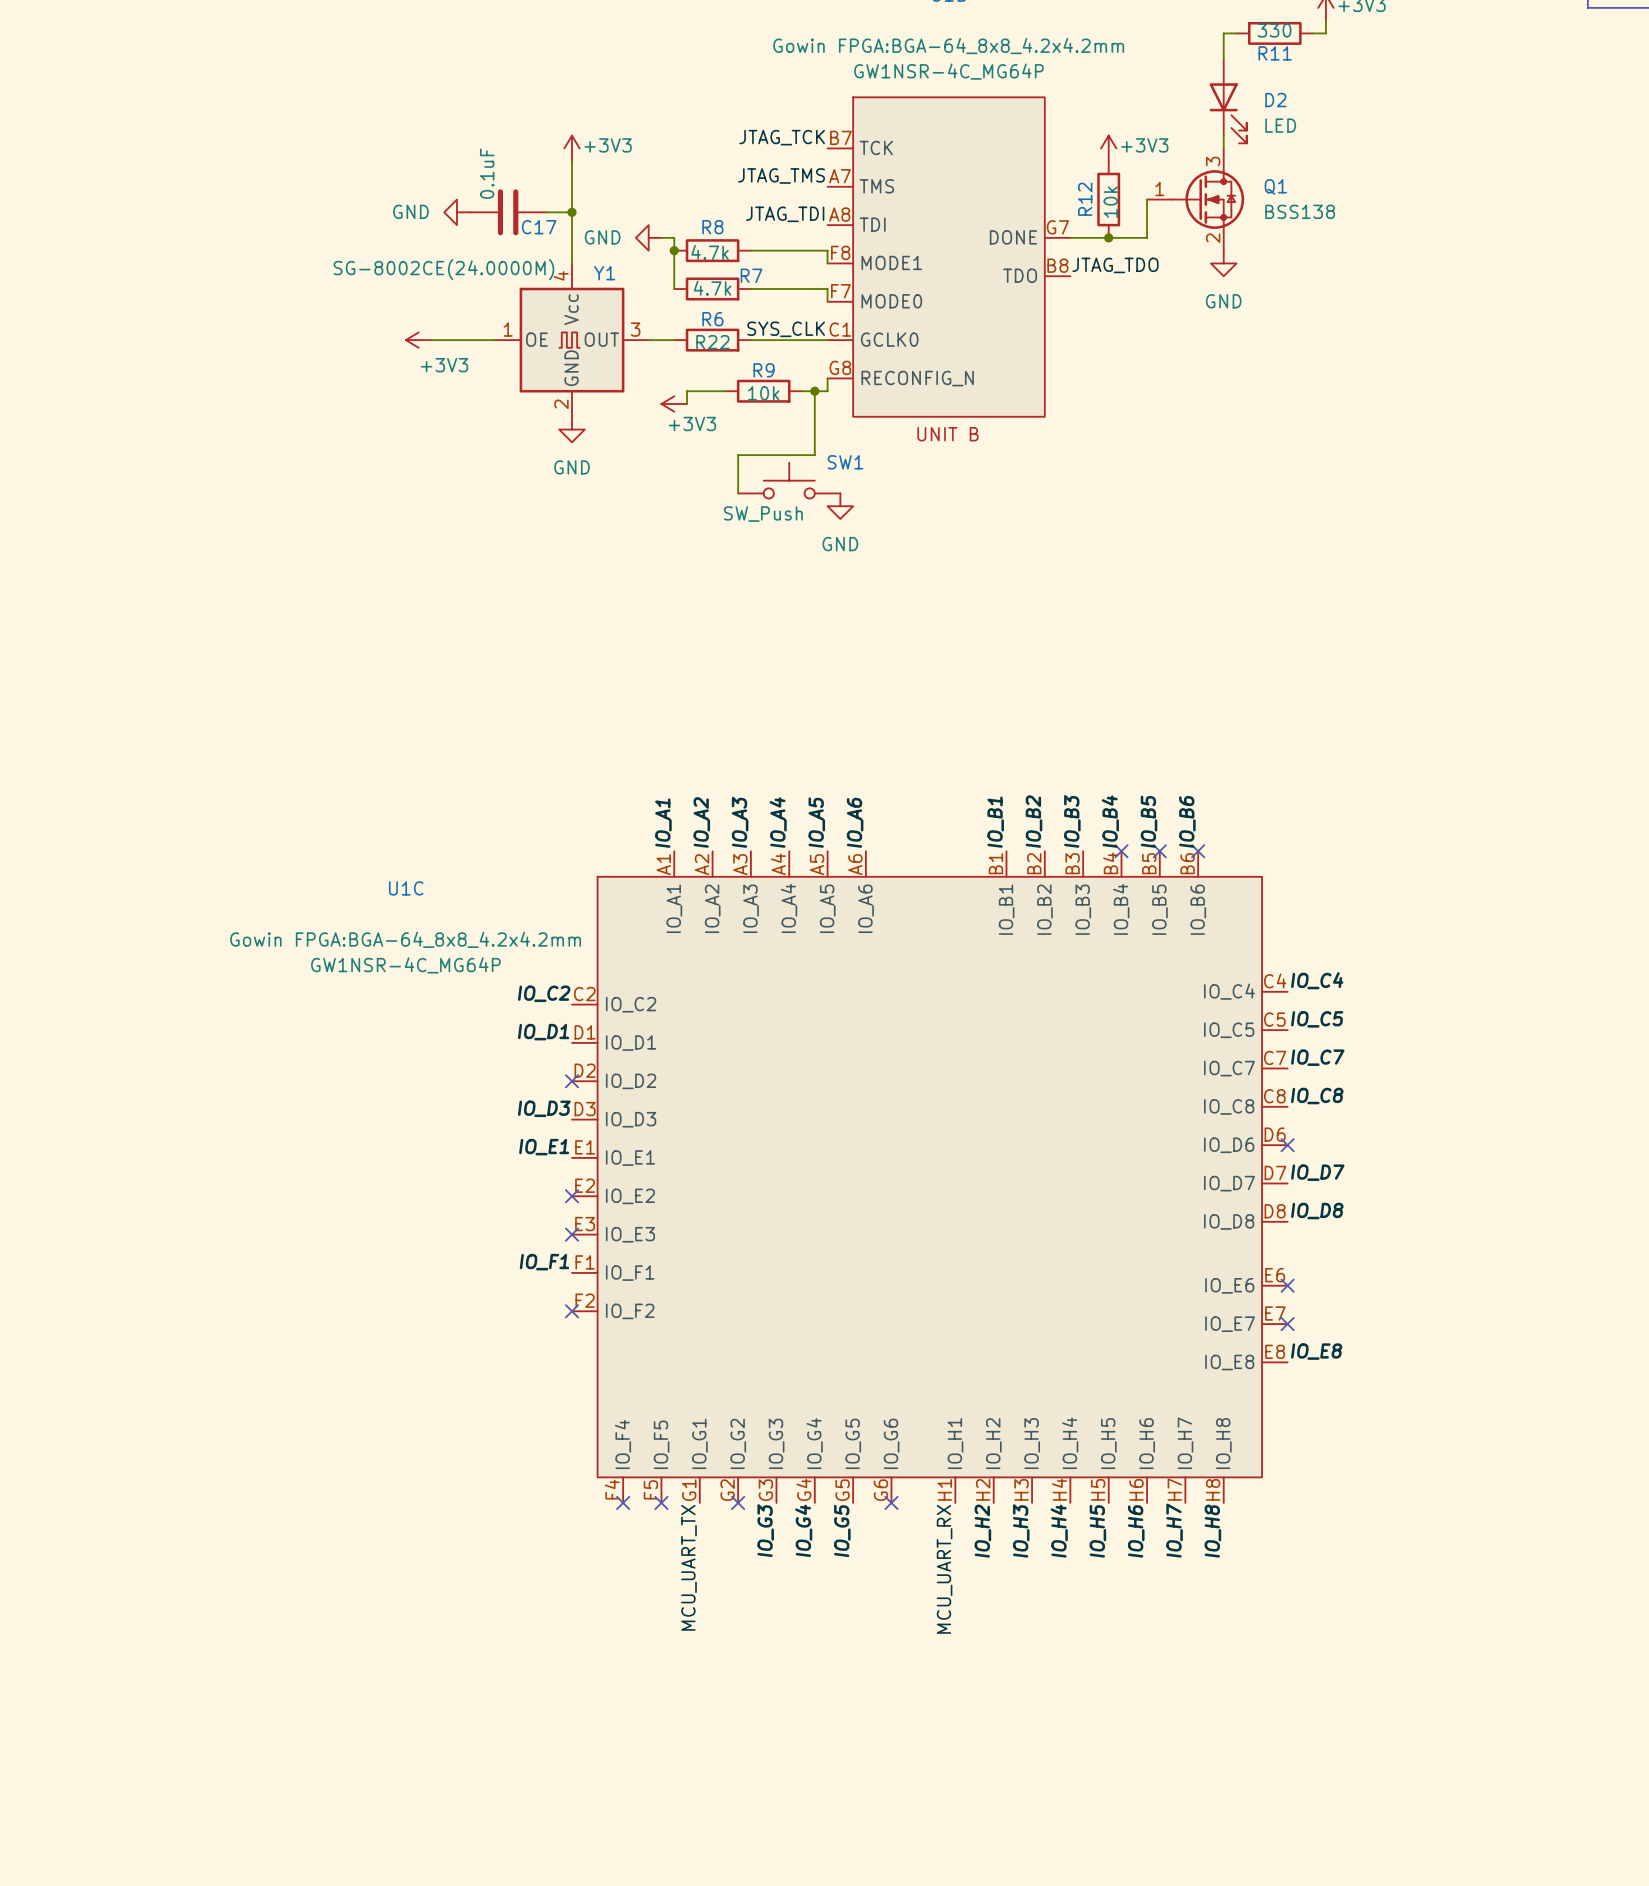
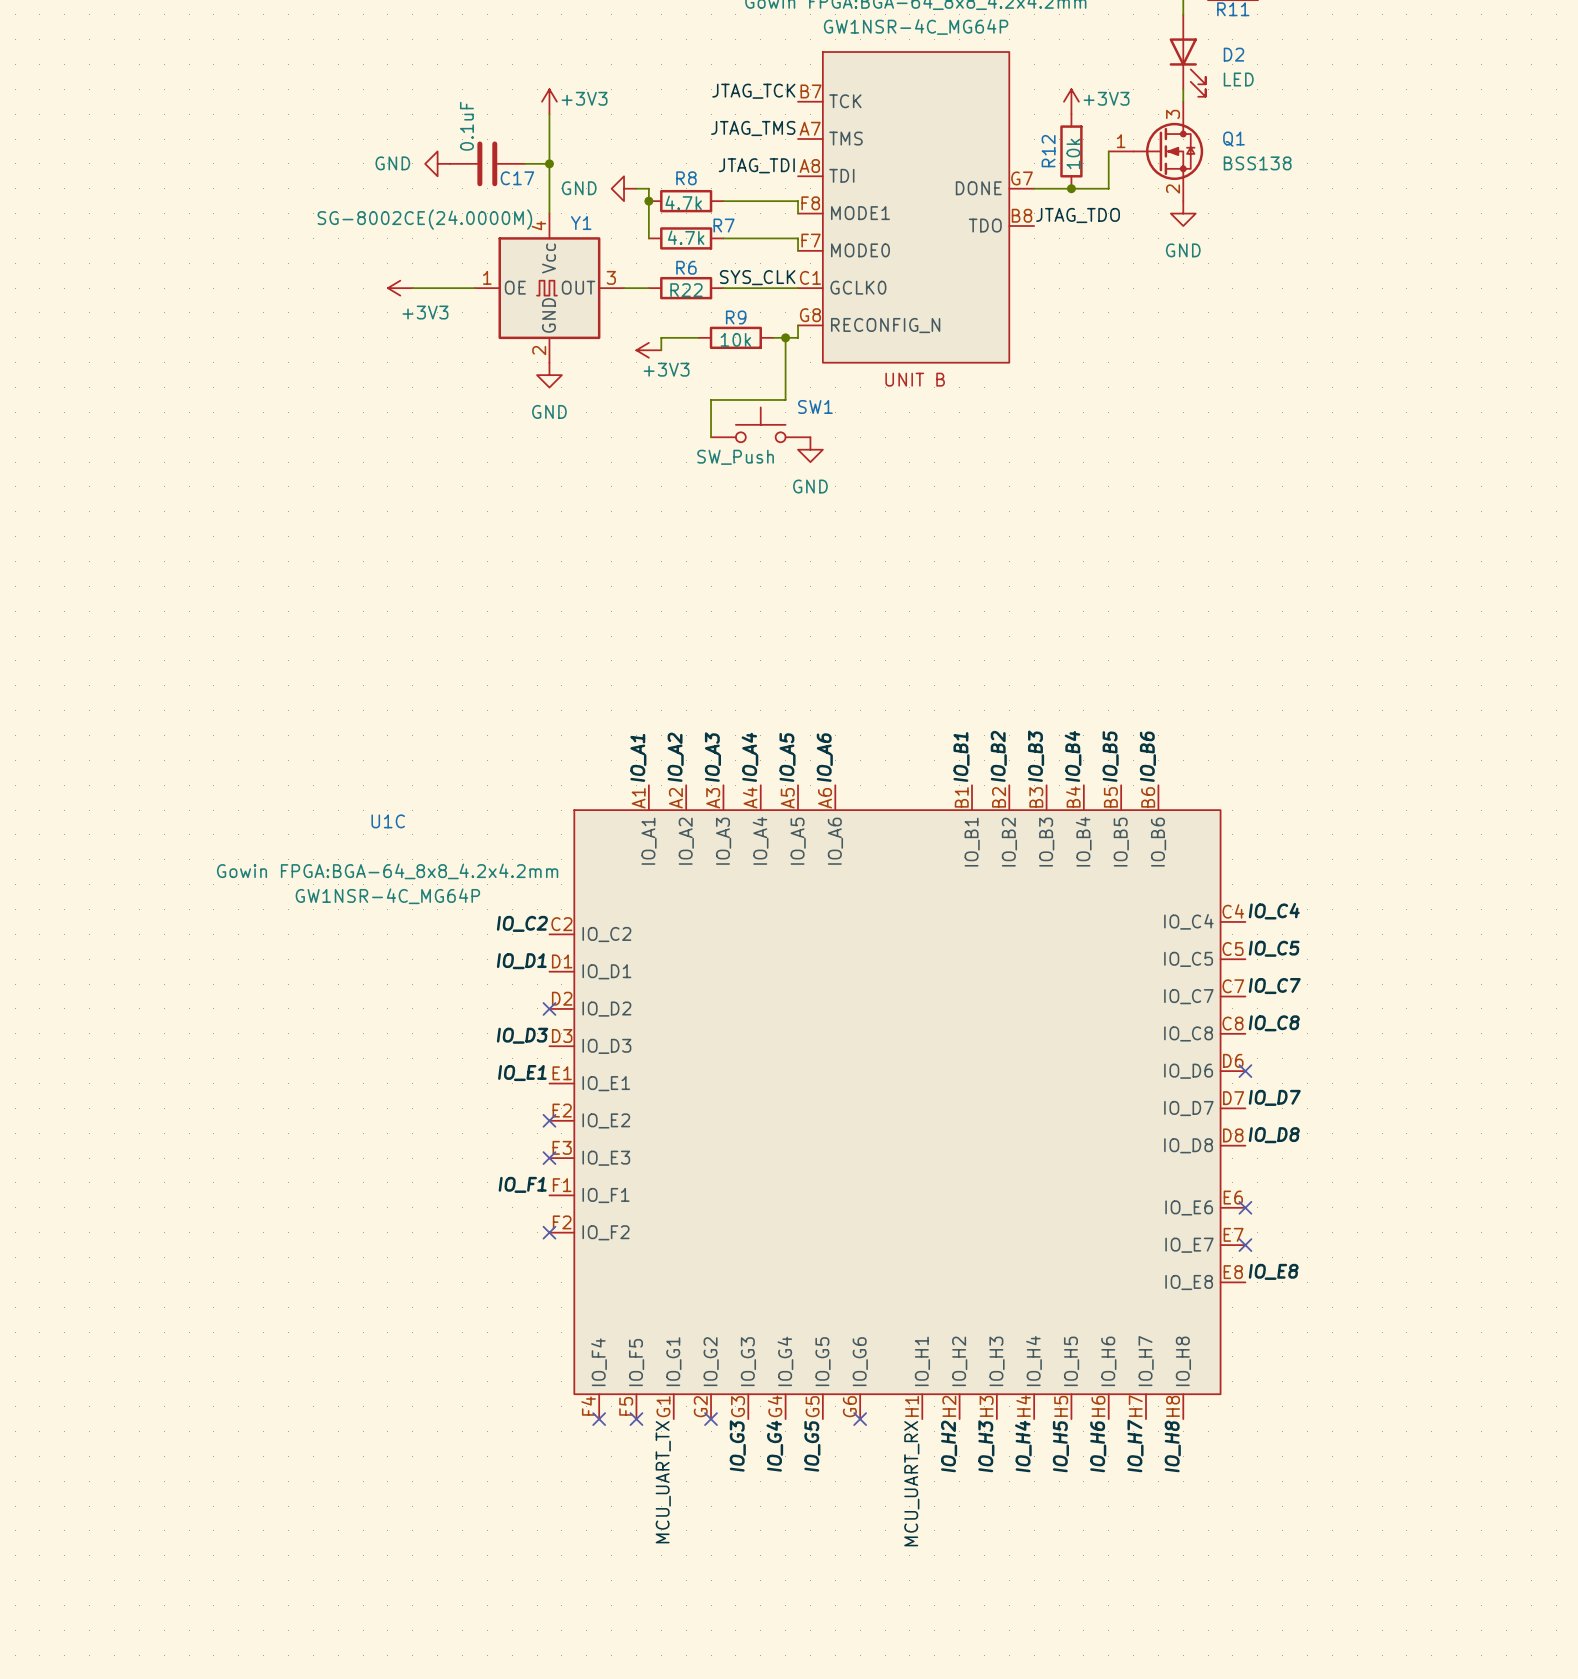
no-connect mark: (1121, 851) -> none
no-connect mark: (1159, 851) -> none
no-connect mark: (1198, 851) -> none

